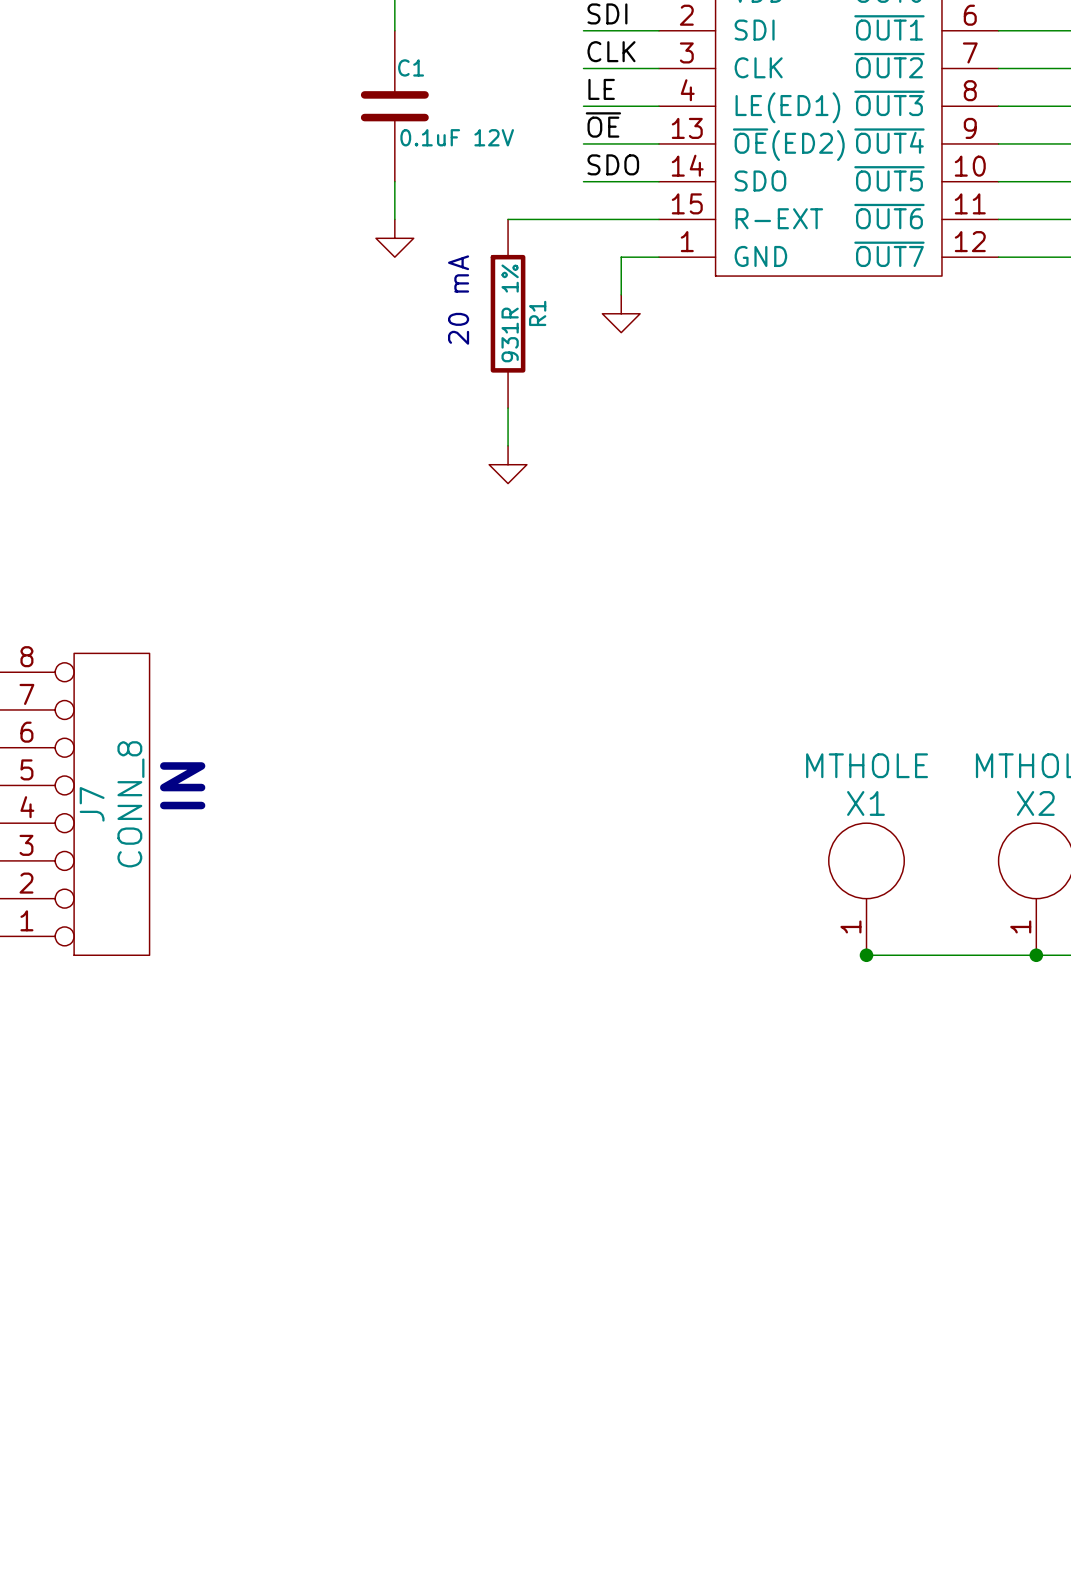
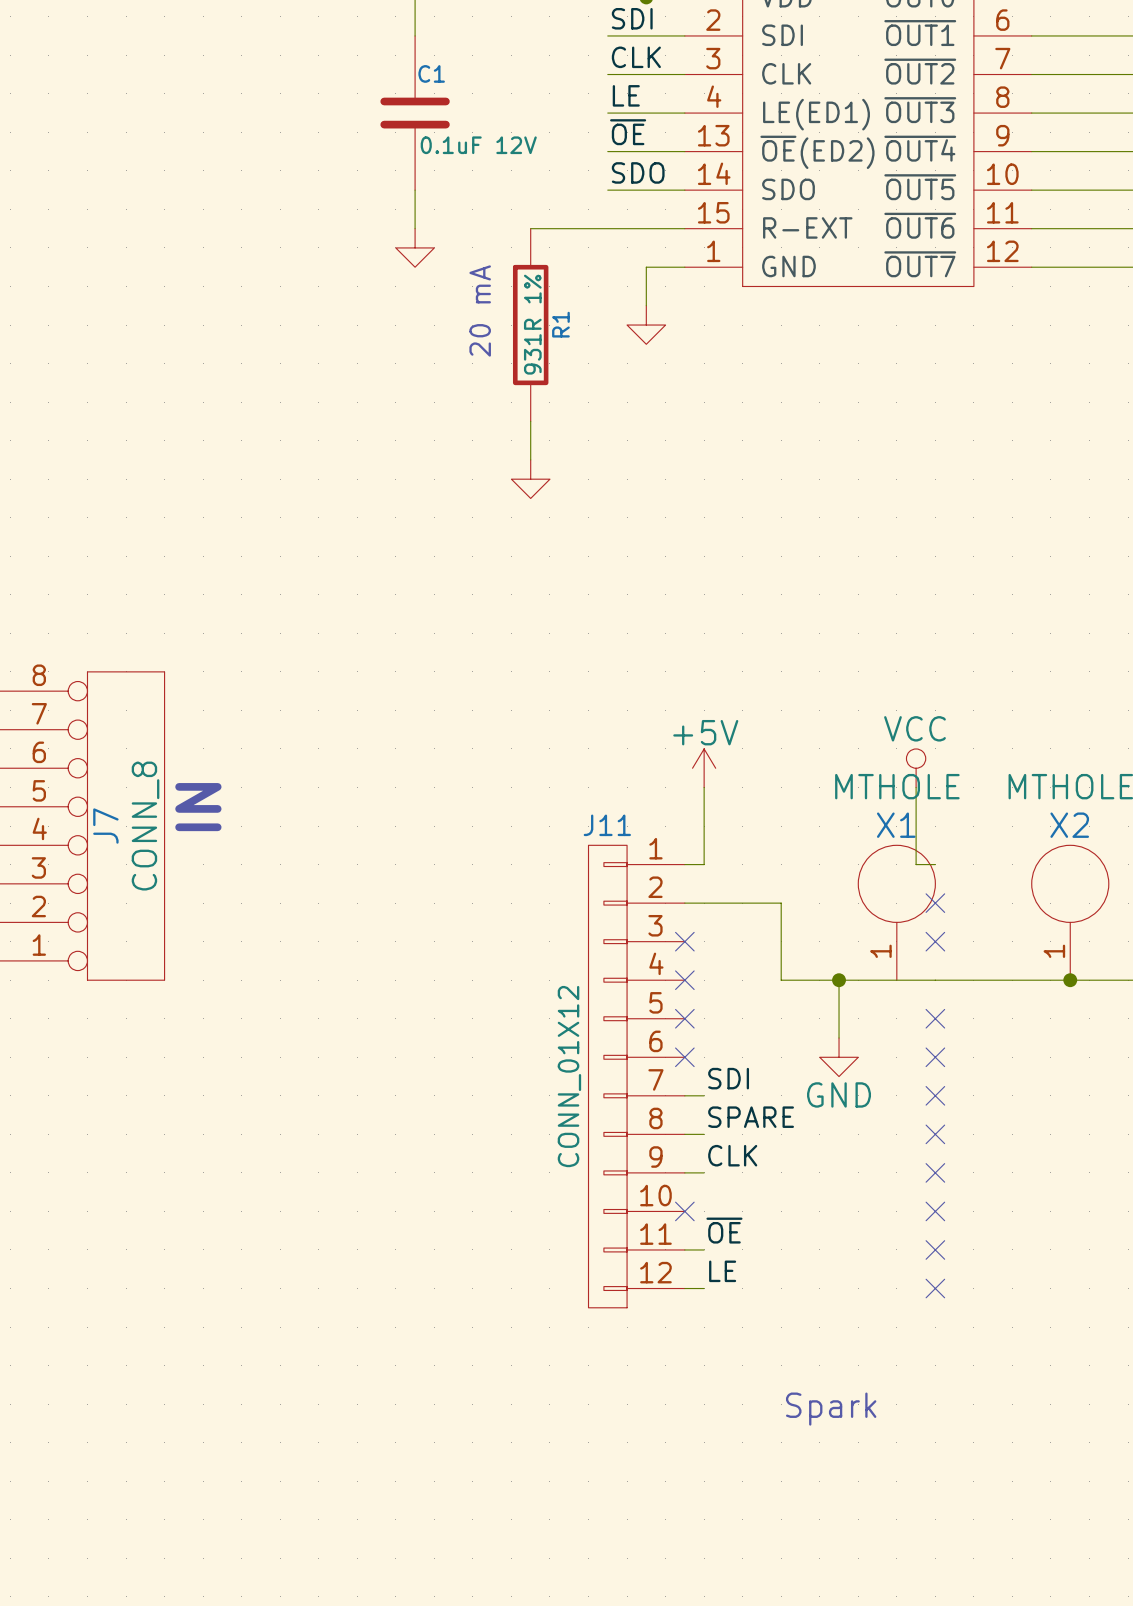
power symbol: none -> +5V (704, 768)
power symbol: none -> VCC (916, 768)
wire: none -> (704, 787) (704, 864) (684, 864)
wire: none -> (916, 787) (916, 864) (935, 864)
wire: none -> (684, 903) (781, 903) (781, 980) (896, 980)
no-connect mark: none -> (935, 903)
no-connect mark: none -> (684, 941)
no-connect mark: none -> (935, 941)
no-connect mark: none -> (684, 980)
wire: none -> (839, 980) (839, 1038)
junction position: (866, 955) -> (839, 980)
no-connect mark: none -> (684, 1018)
no-connect mark: none -> (935, 1018)
no-connect mark: none -> (684, 1057)
power symbol: none -> GND (839, 1057)
no-connect mark: none -> (935, 1057)
J11: none -> CONN_01X12 (636, 1076)
label: none -> SDI (728, 1078)
wire: none -> (684, 1095) (704, 1095)
no-connect mark: none -> (935, 1095)
label: none -> SPARE (751, 1117)
wire: none -> (684, 1134) (704, 1134)
no-connect mark: none -> (935, 1134)
label: none -> CLK (732, 1155)
wire: none -> (684, 1172) (704, 1172)
no-connect mark: none -> (935, 1172)
no-connect mark: none -> (684, 1211)
no-connect mark: none -> (935, 1211)
label: none -> ~{OE} (724, 1230)
wire: none -> (684, 1249) (704, 1249)
no-connect mark: none -> (935, 1249)
label: none -> LE (722, 1271)
wire: none -> (684, 1288) (704, 1288)
no-connect mark: none -> (935, 1288)
text: none -> Spark (831, 1409)

